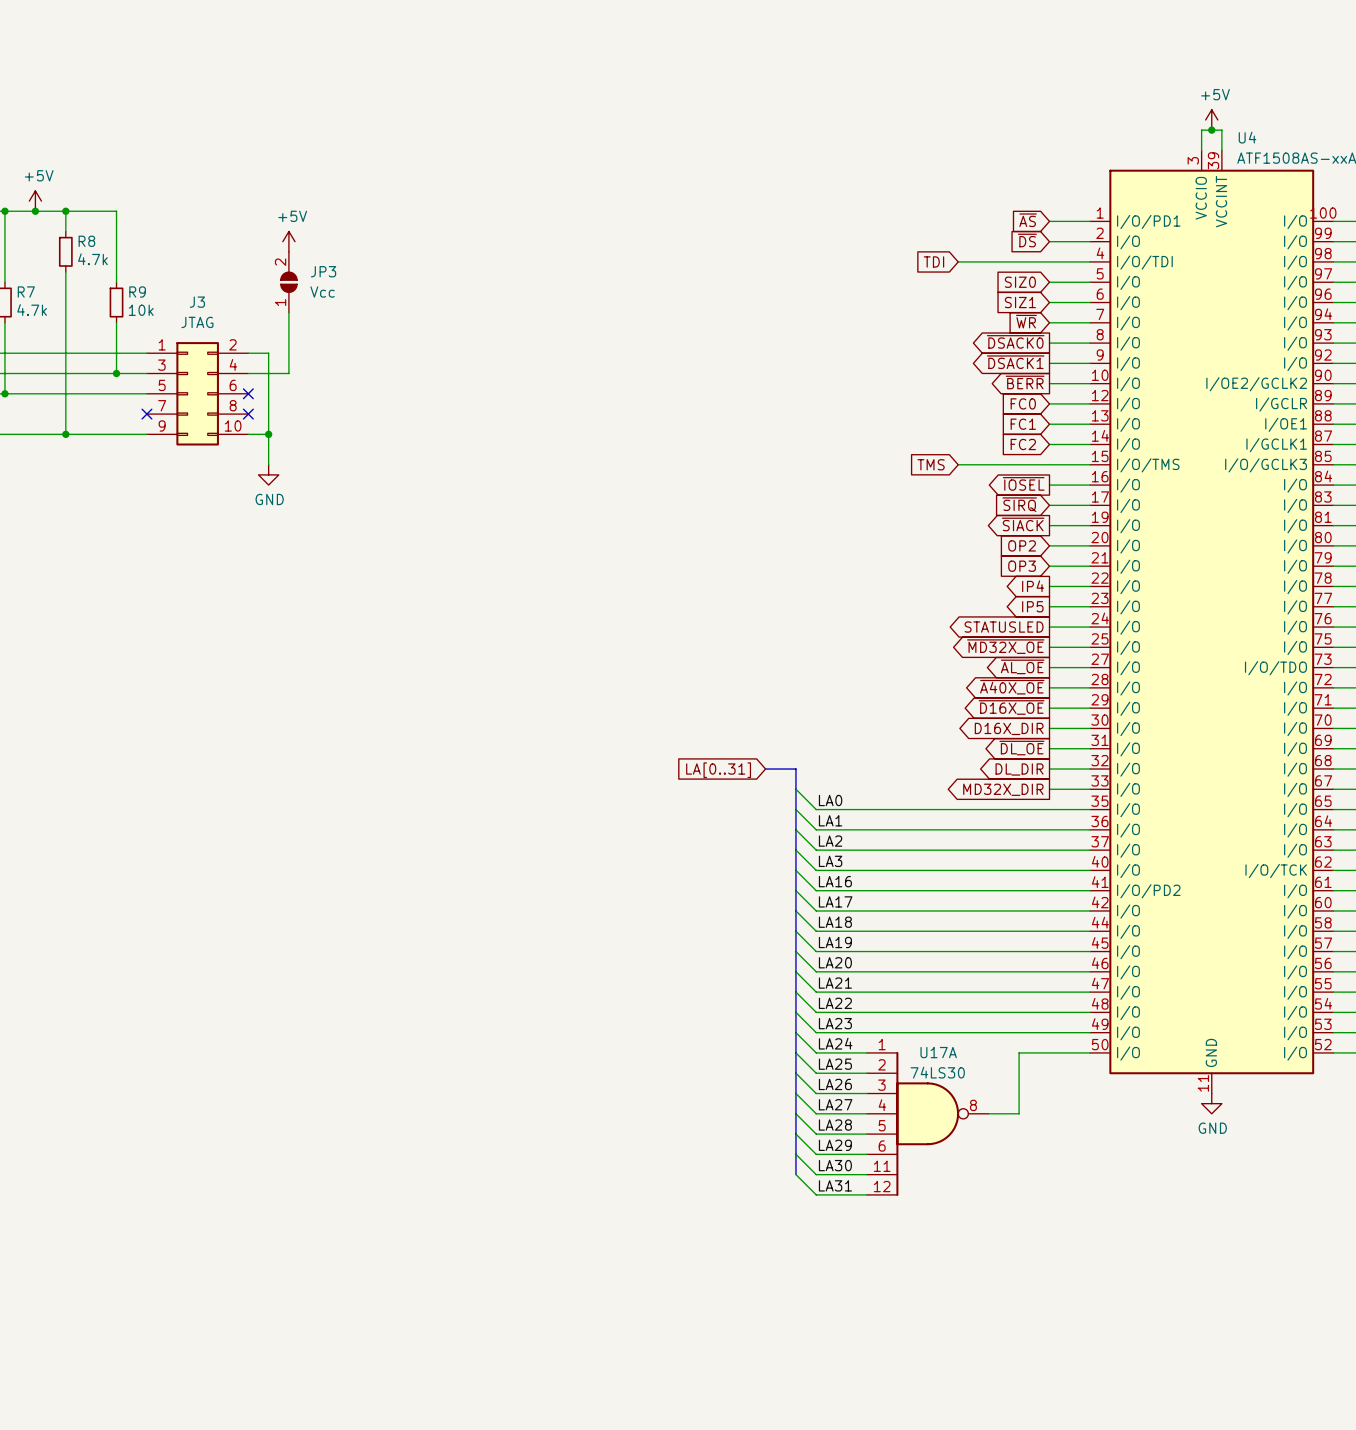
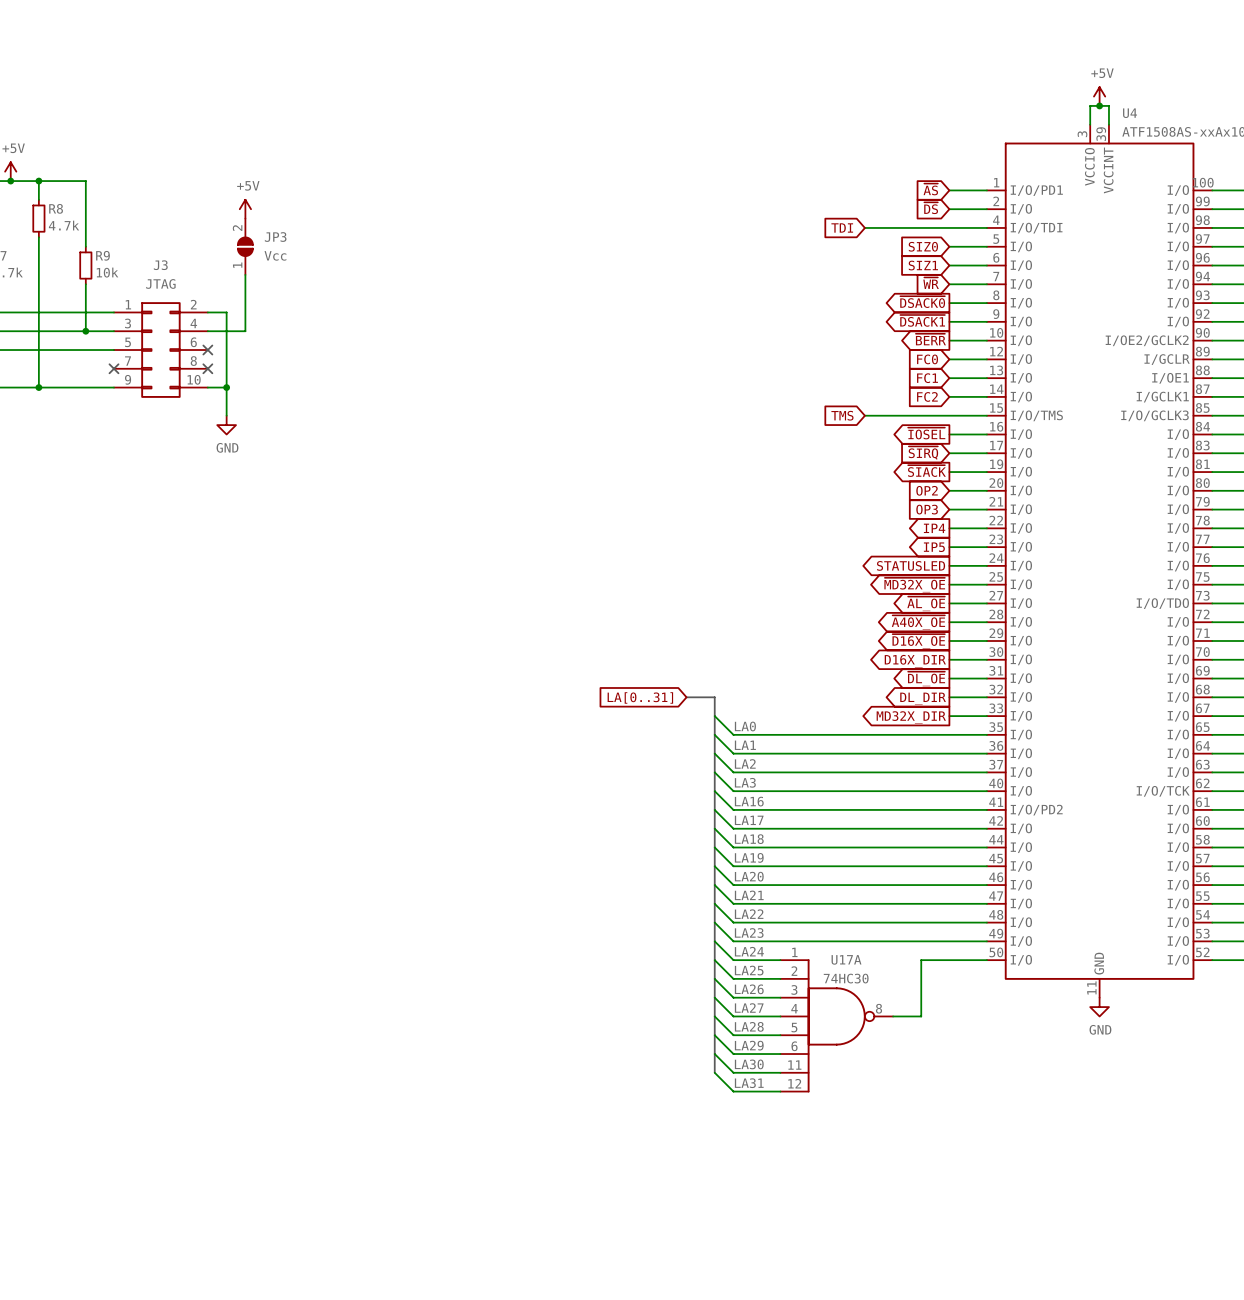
U17A value: 74LS30 (937, 1072) -> 74HC30 (846, 978)

